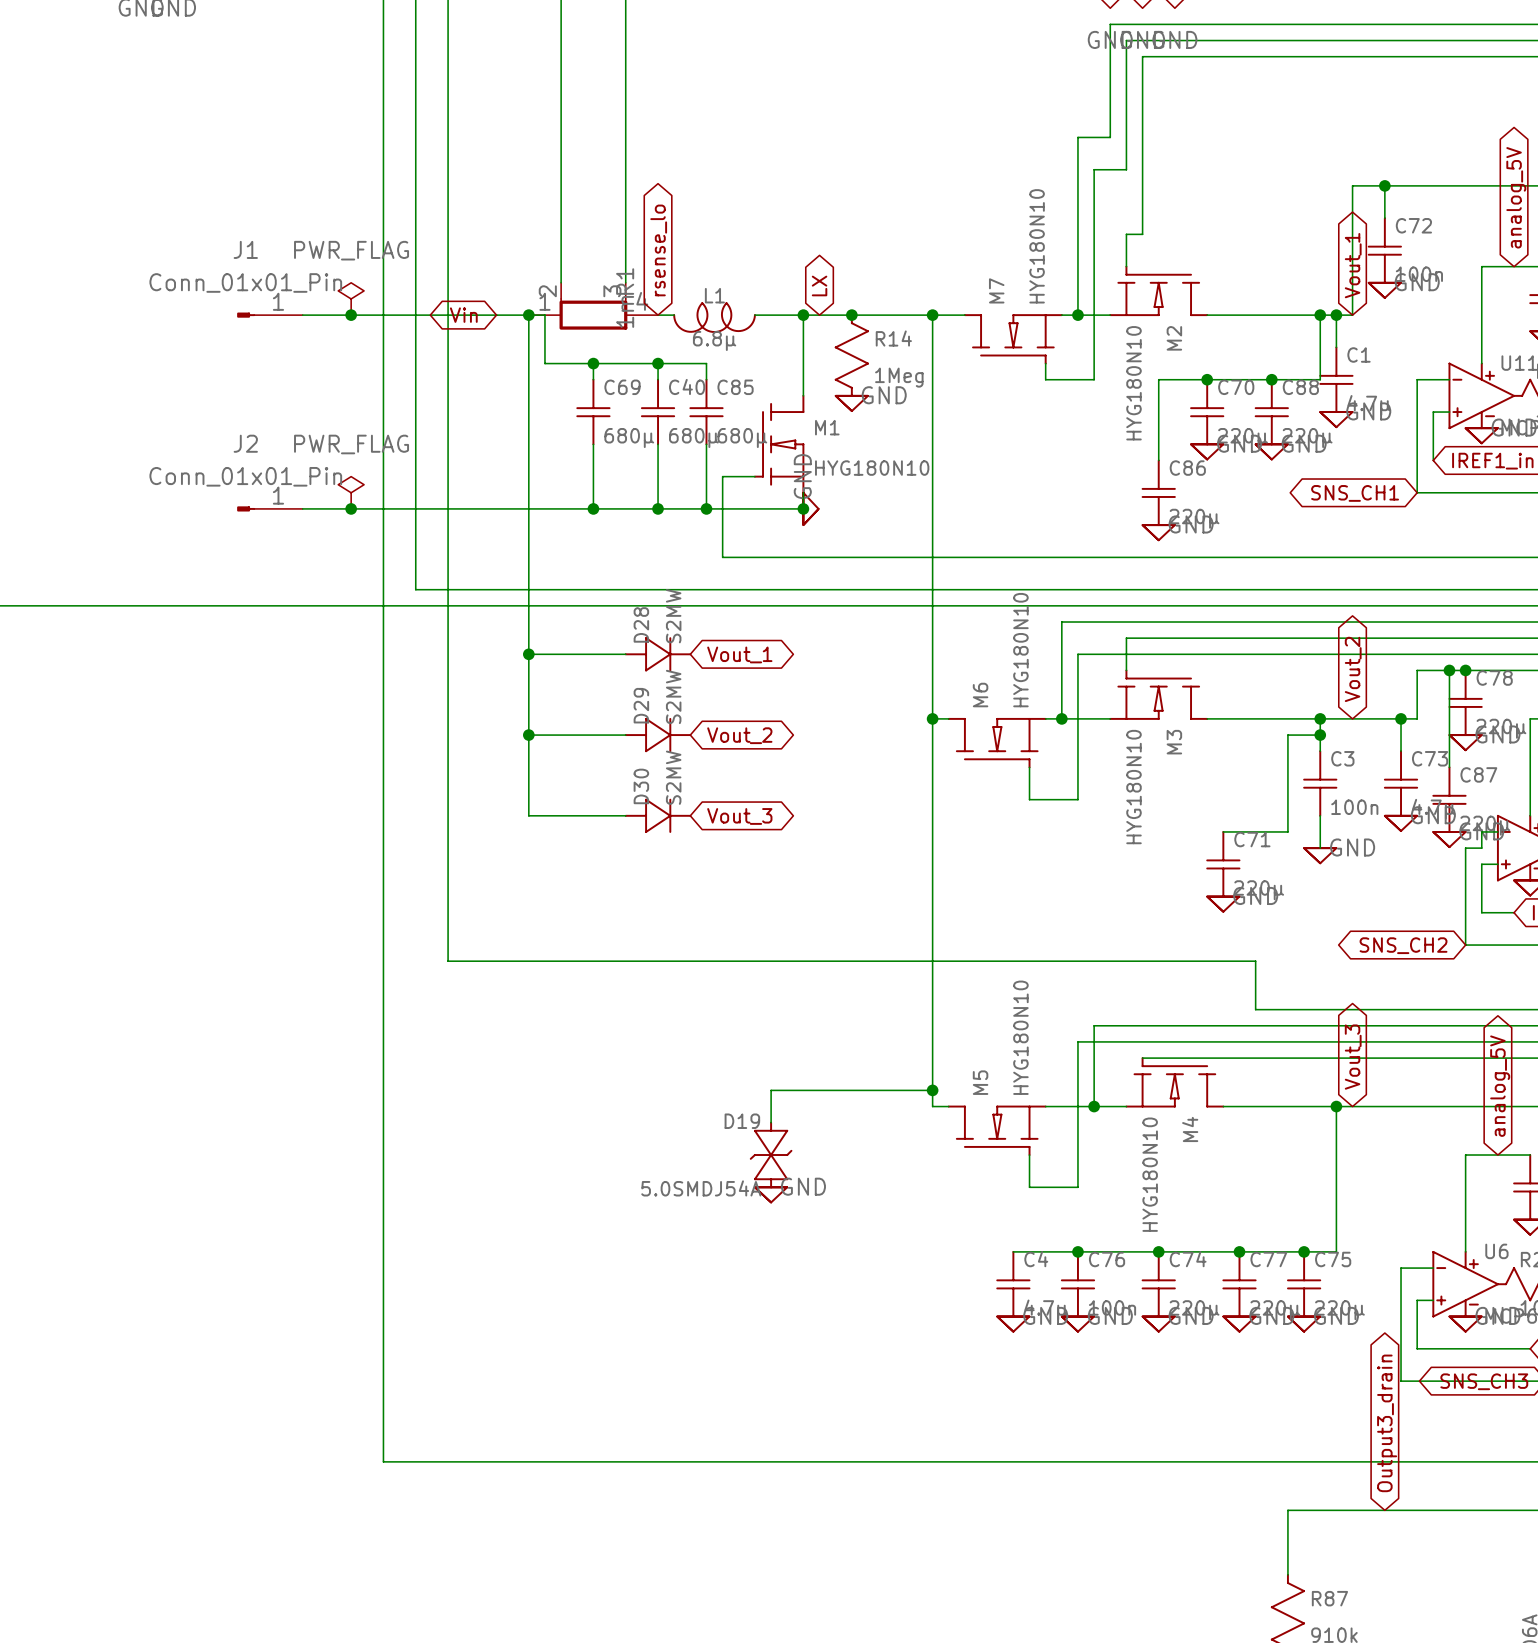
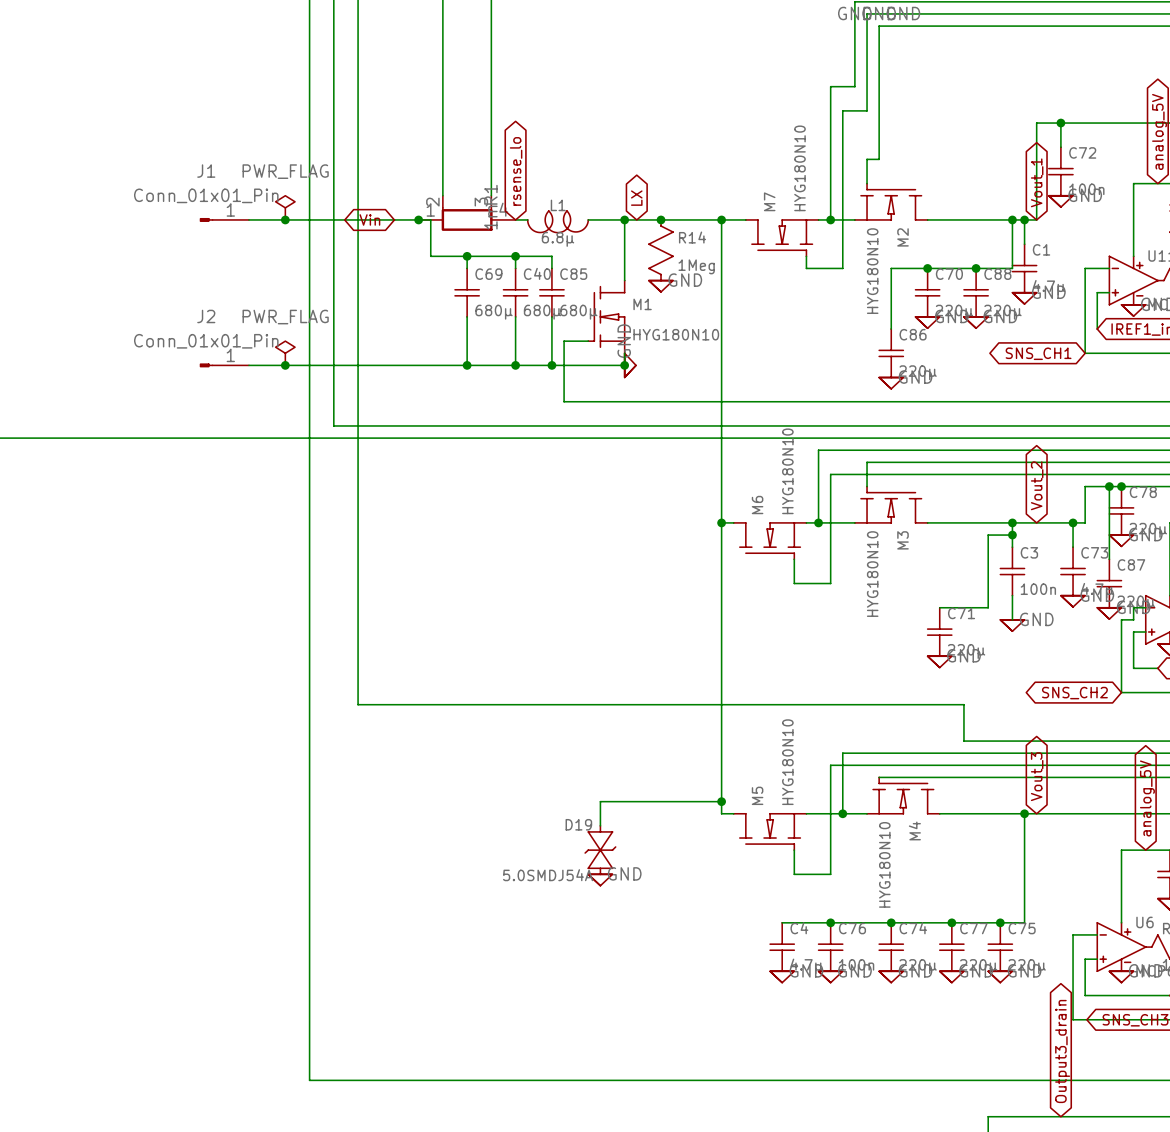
wire: (528, 315) (528, 815) (625, 815) -> none
wire: (528, 654) (625, 654) -> none
junction: (528, 654) -> none
D28: S2MW (658, 654) -> none
global label: Vout_1 (739, 654) -> none
wire: (528, 735) (625, 735) -> none
junction: (528, 735) -> none
D29: S2MW (658, 735) -> none
global label: Vout_2 (739, 735) -> none
D30: S2MW (658, 815) -> none
global label: Vout_3 (739, 816) -> none

